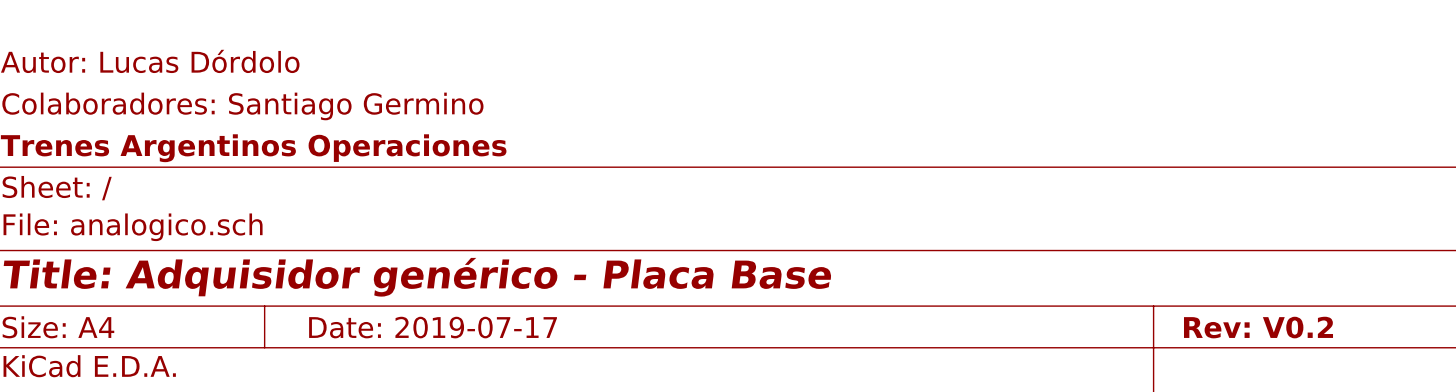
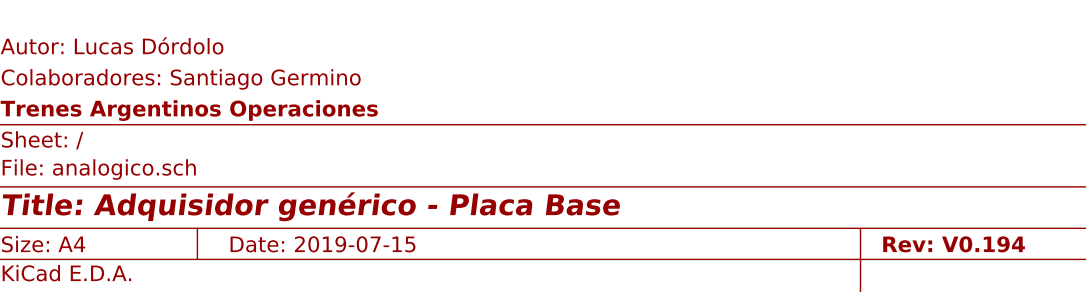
title block: Date: 2019-07-17 (433, 327) -> Date: 2019-07-15 (323, 244)
title block: Rev: V0.2 (1258, 327) -> Rev: V0.194 (954, 244)

